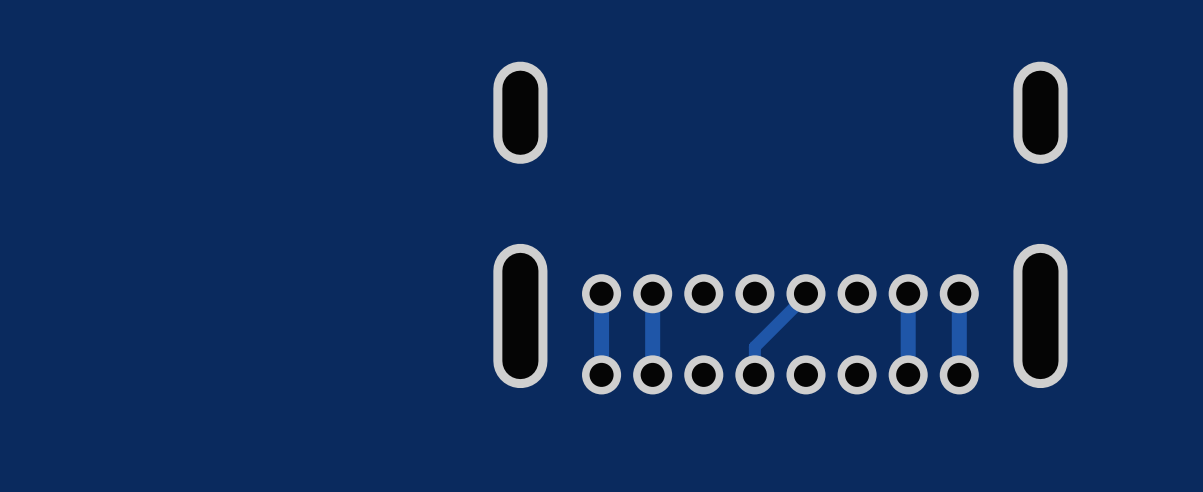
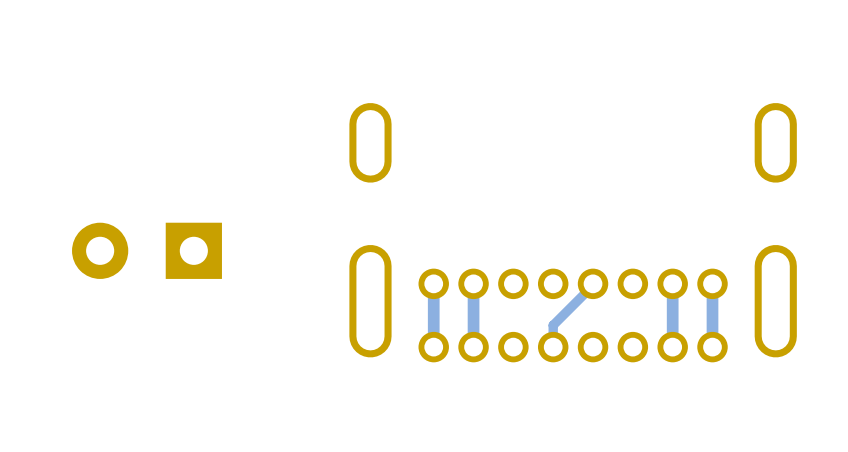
part: none -> (146, 250)

